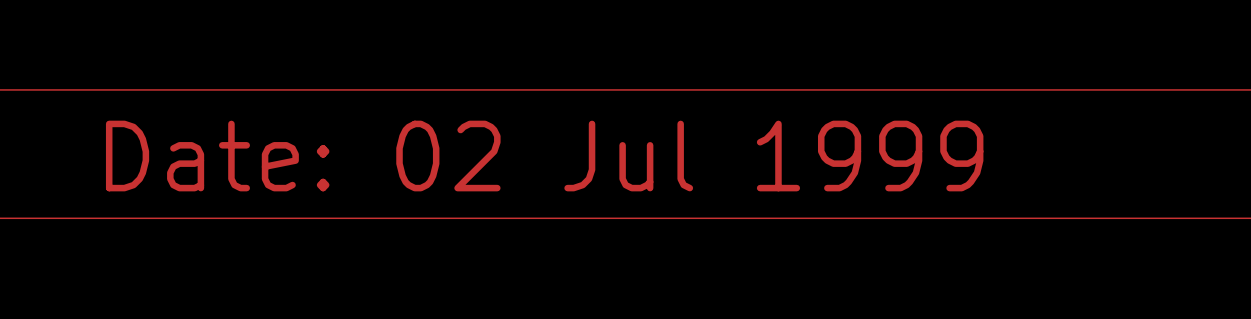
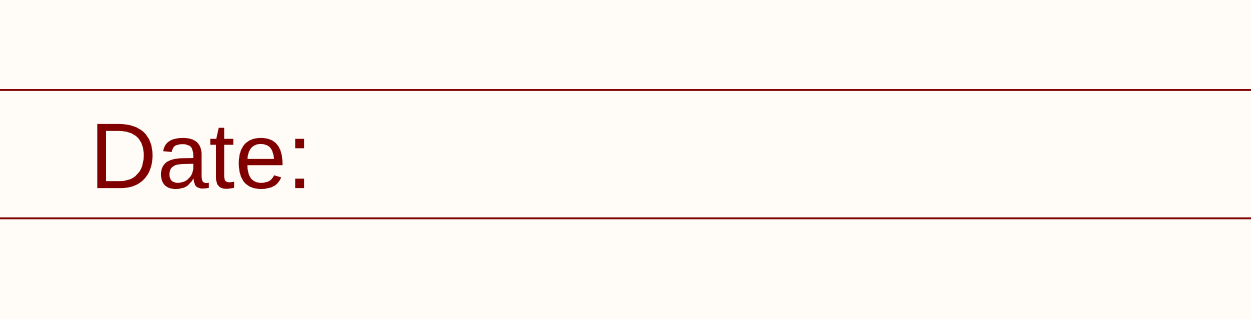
title block: Date: 02 Jul 1999 (544, 156) -> Date: (200, 156)

